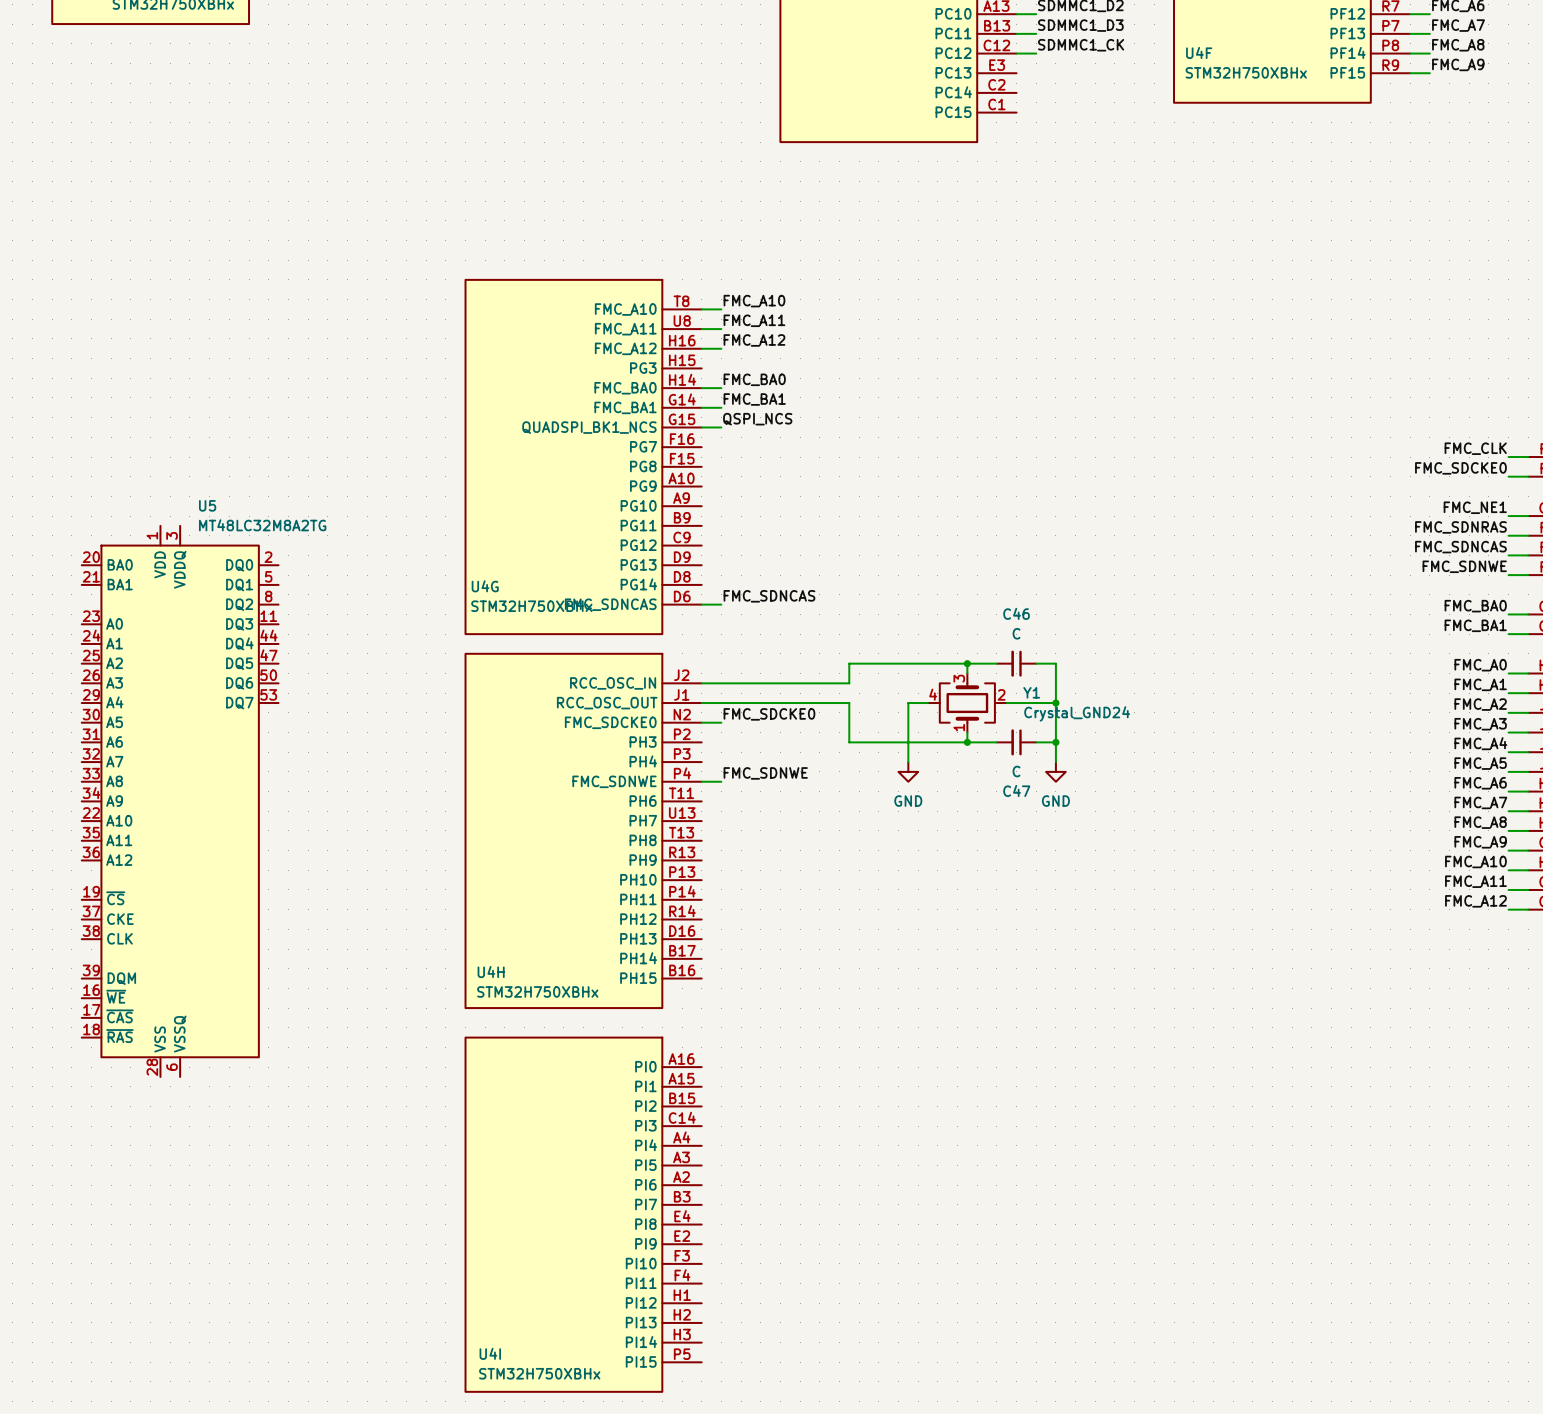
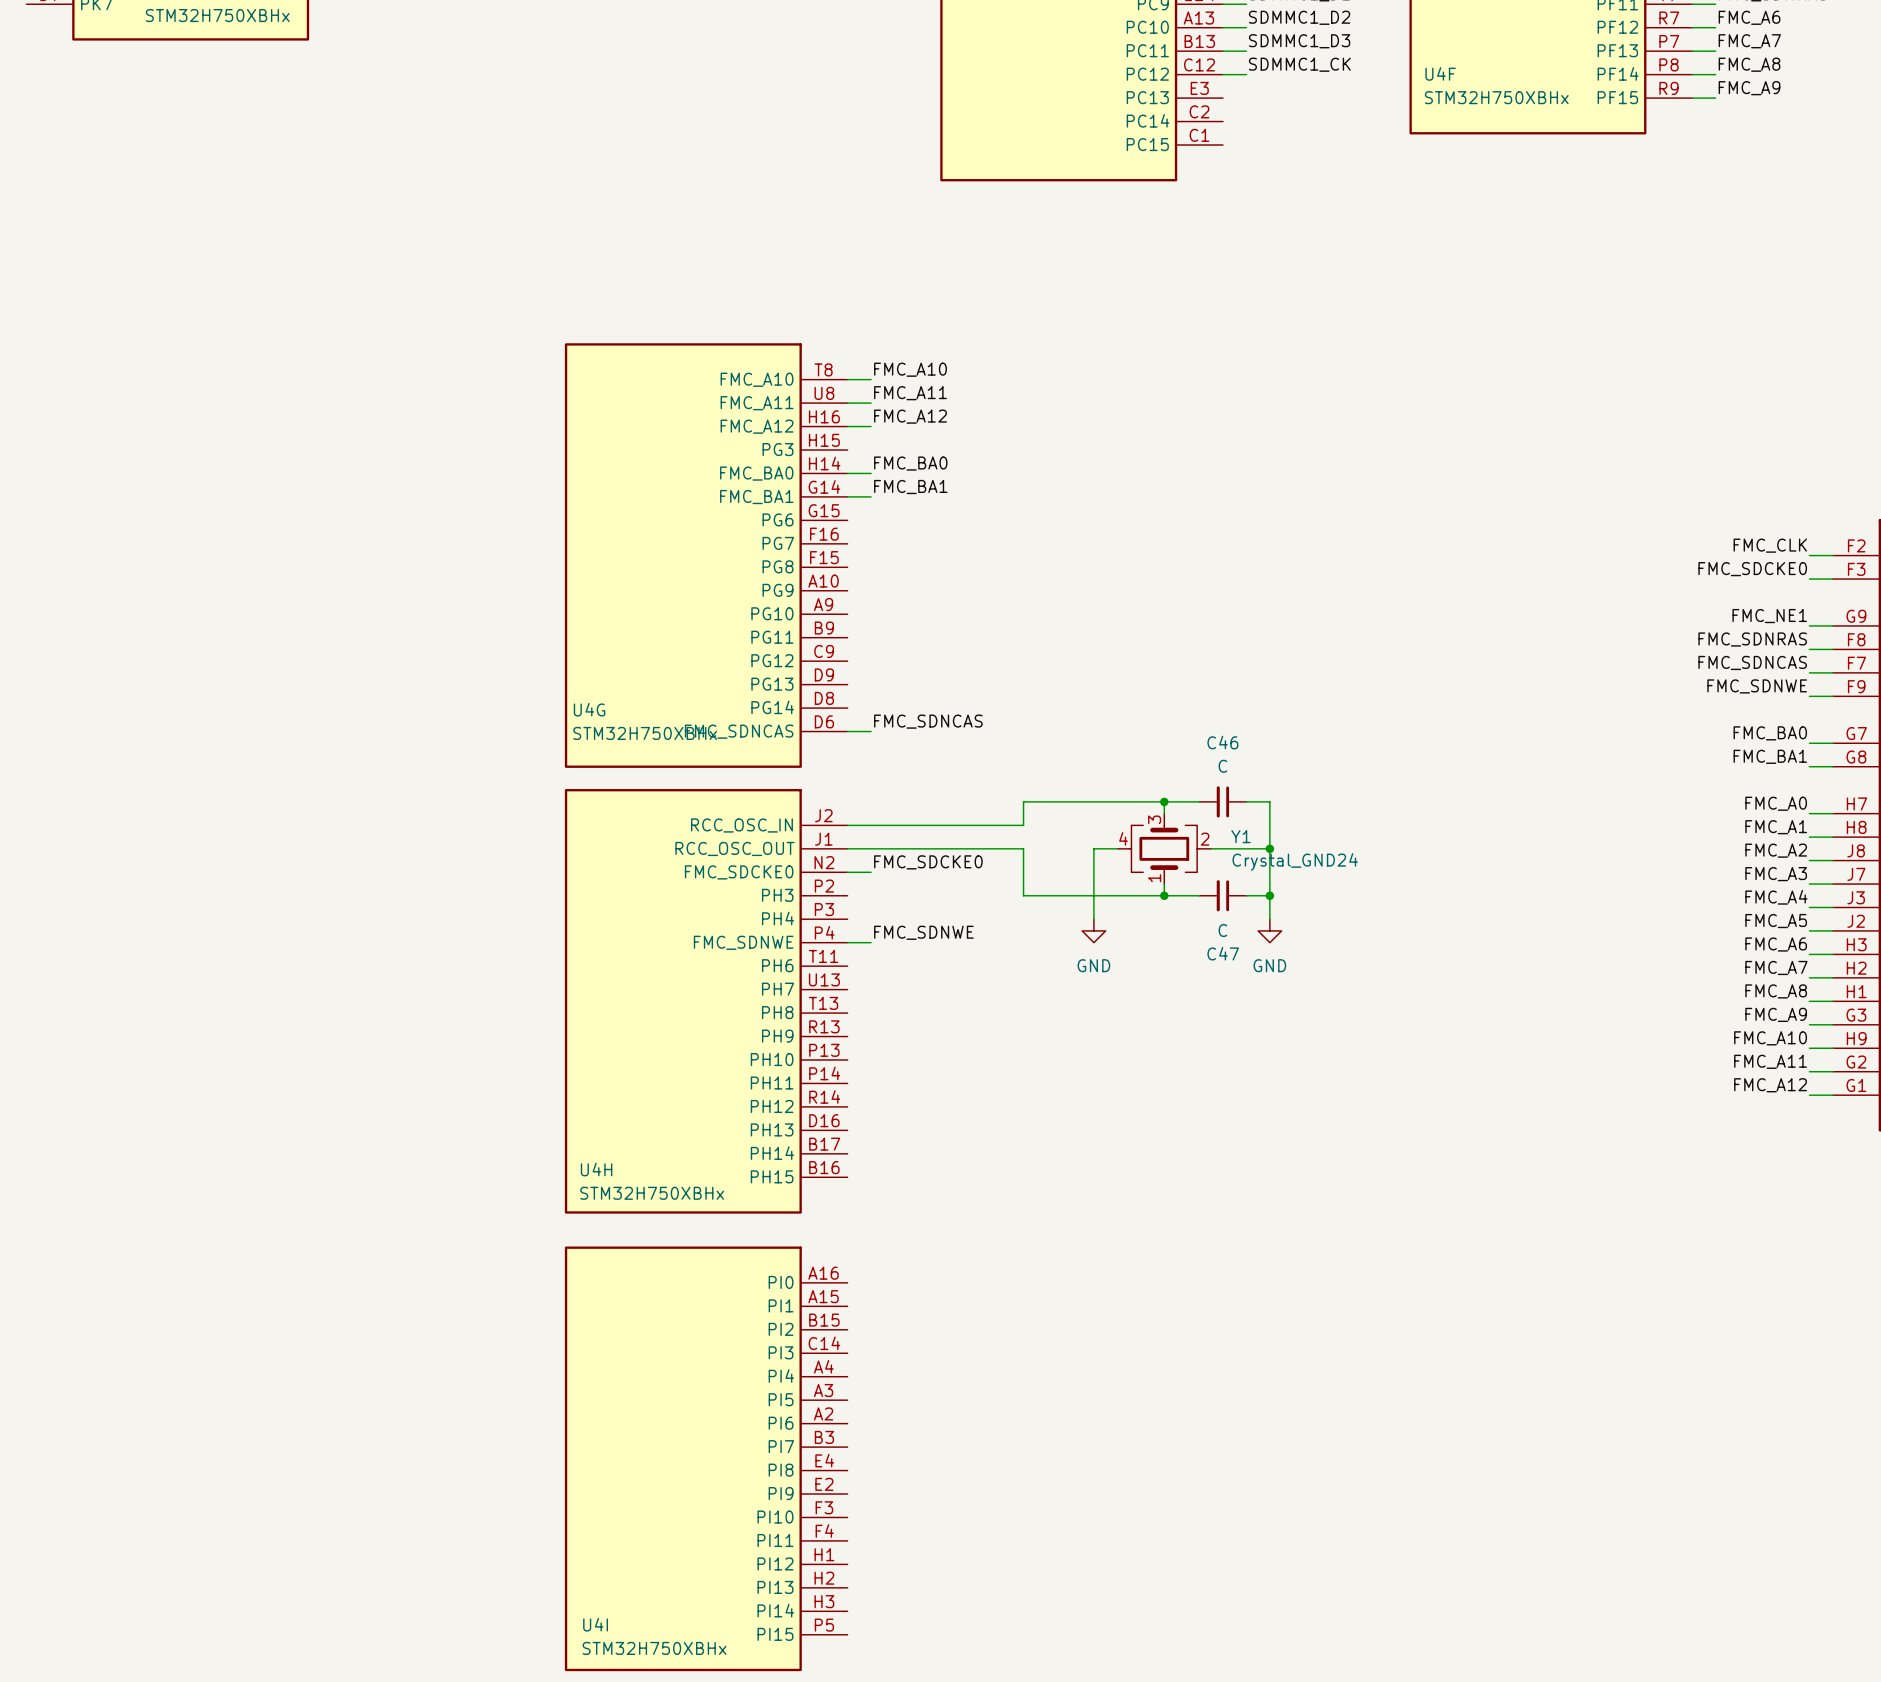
label: QSPI_NCS (757, 419) -> none
U4G pin name: QUADSPI_BK1_NCS (589, 427) -> PG6 (778, 519)
wire: (701, 427) (721, 427) -> none
U5: MT48LC32M8A2TG (180, 801) -> none

